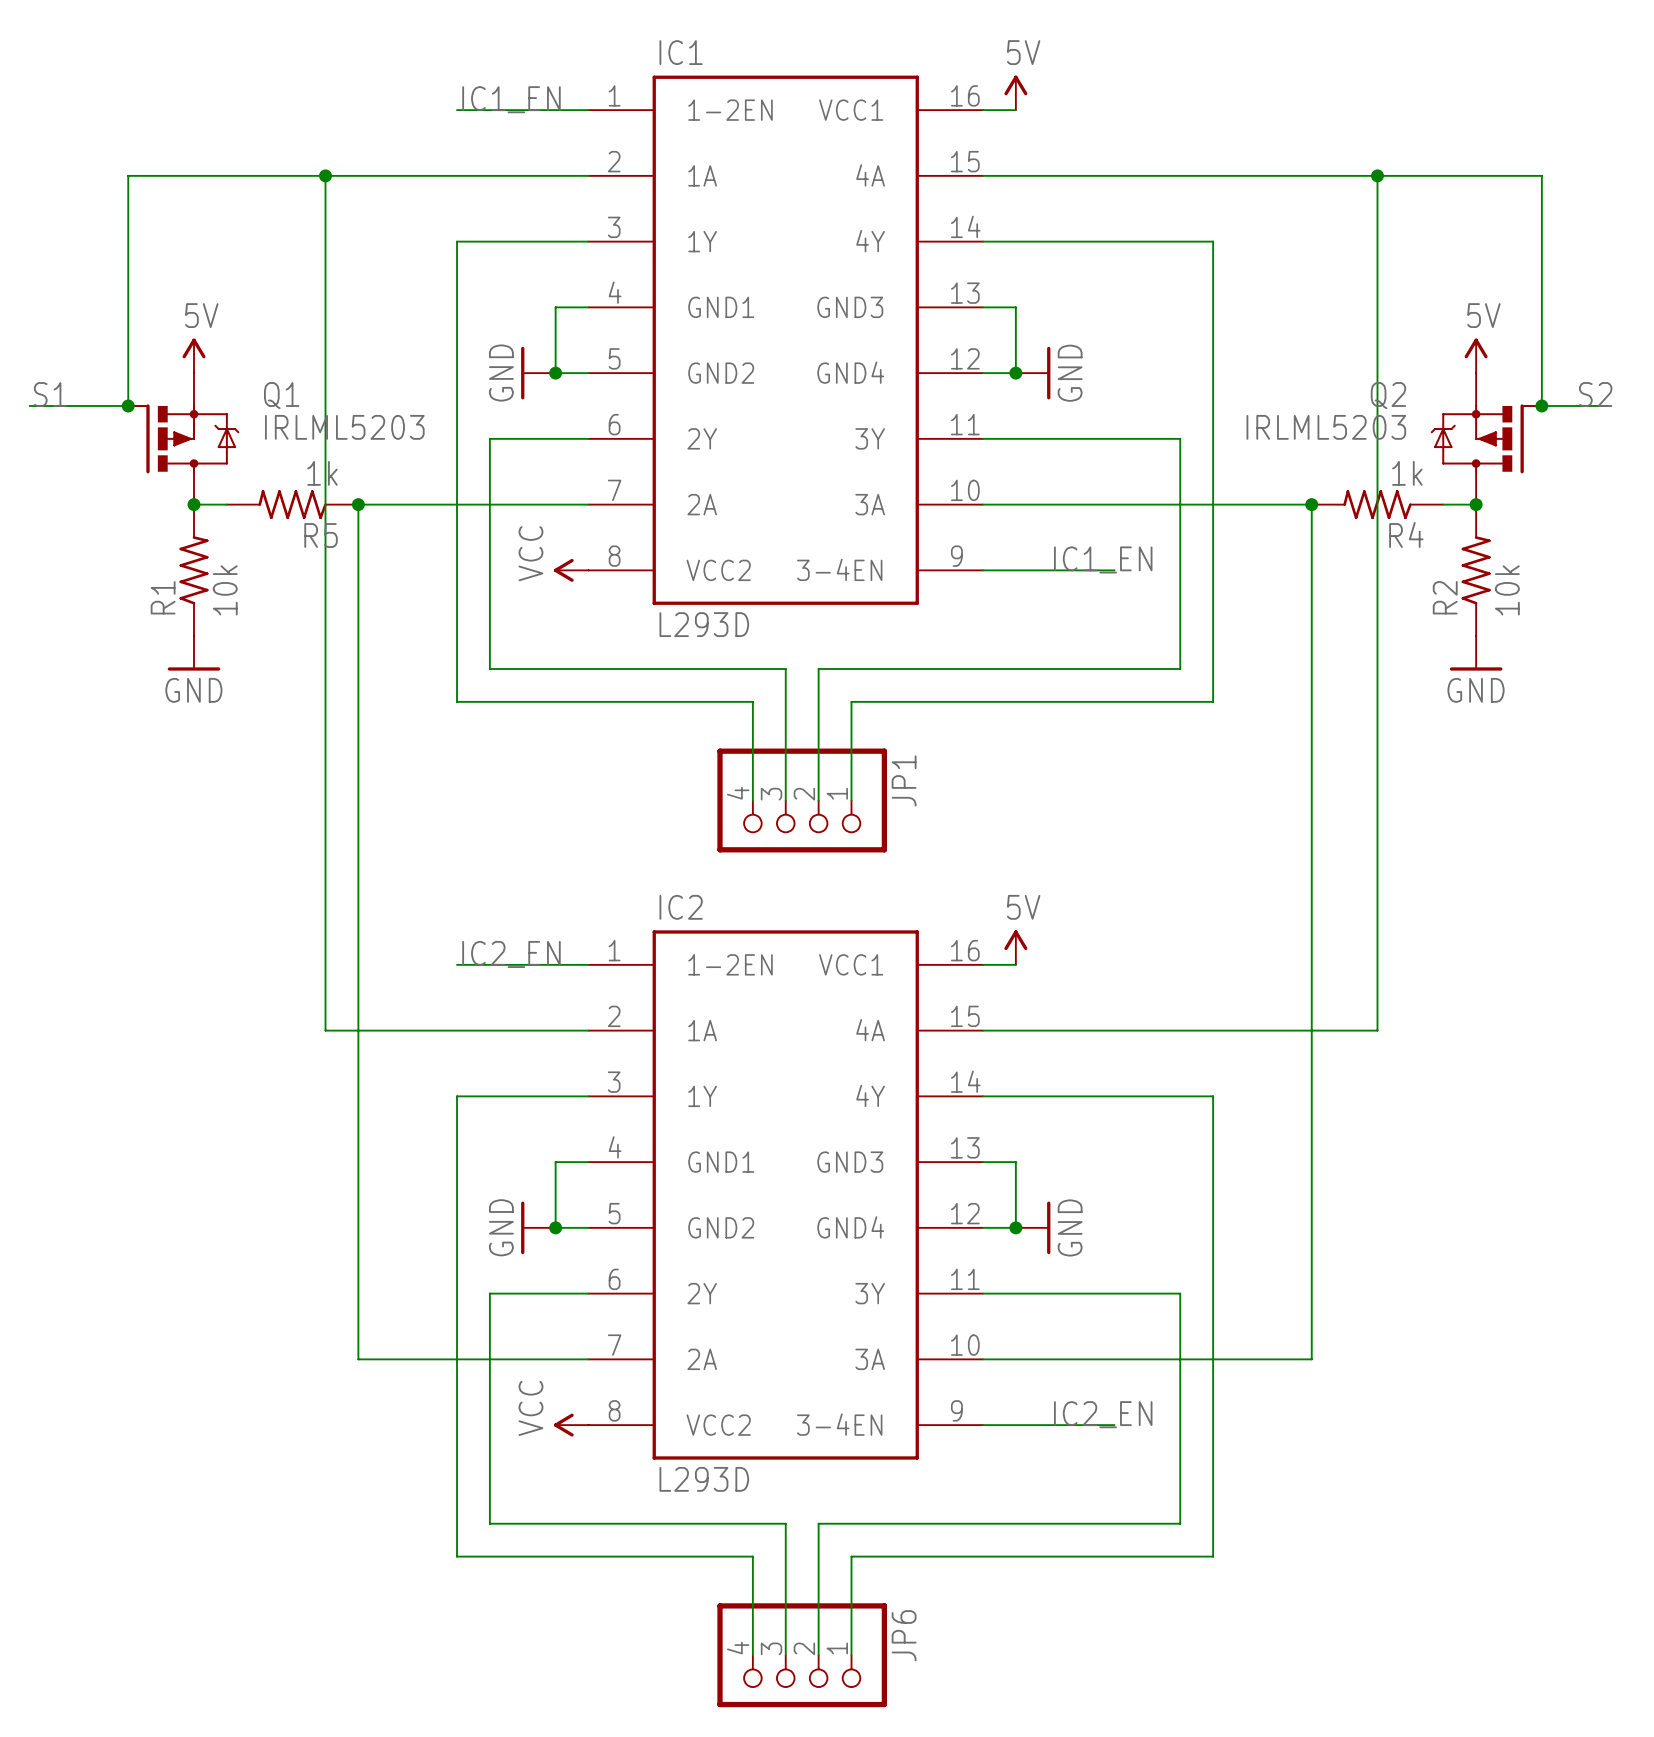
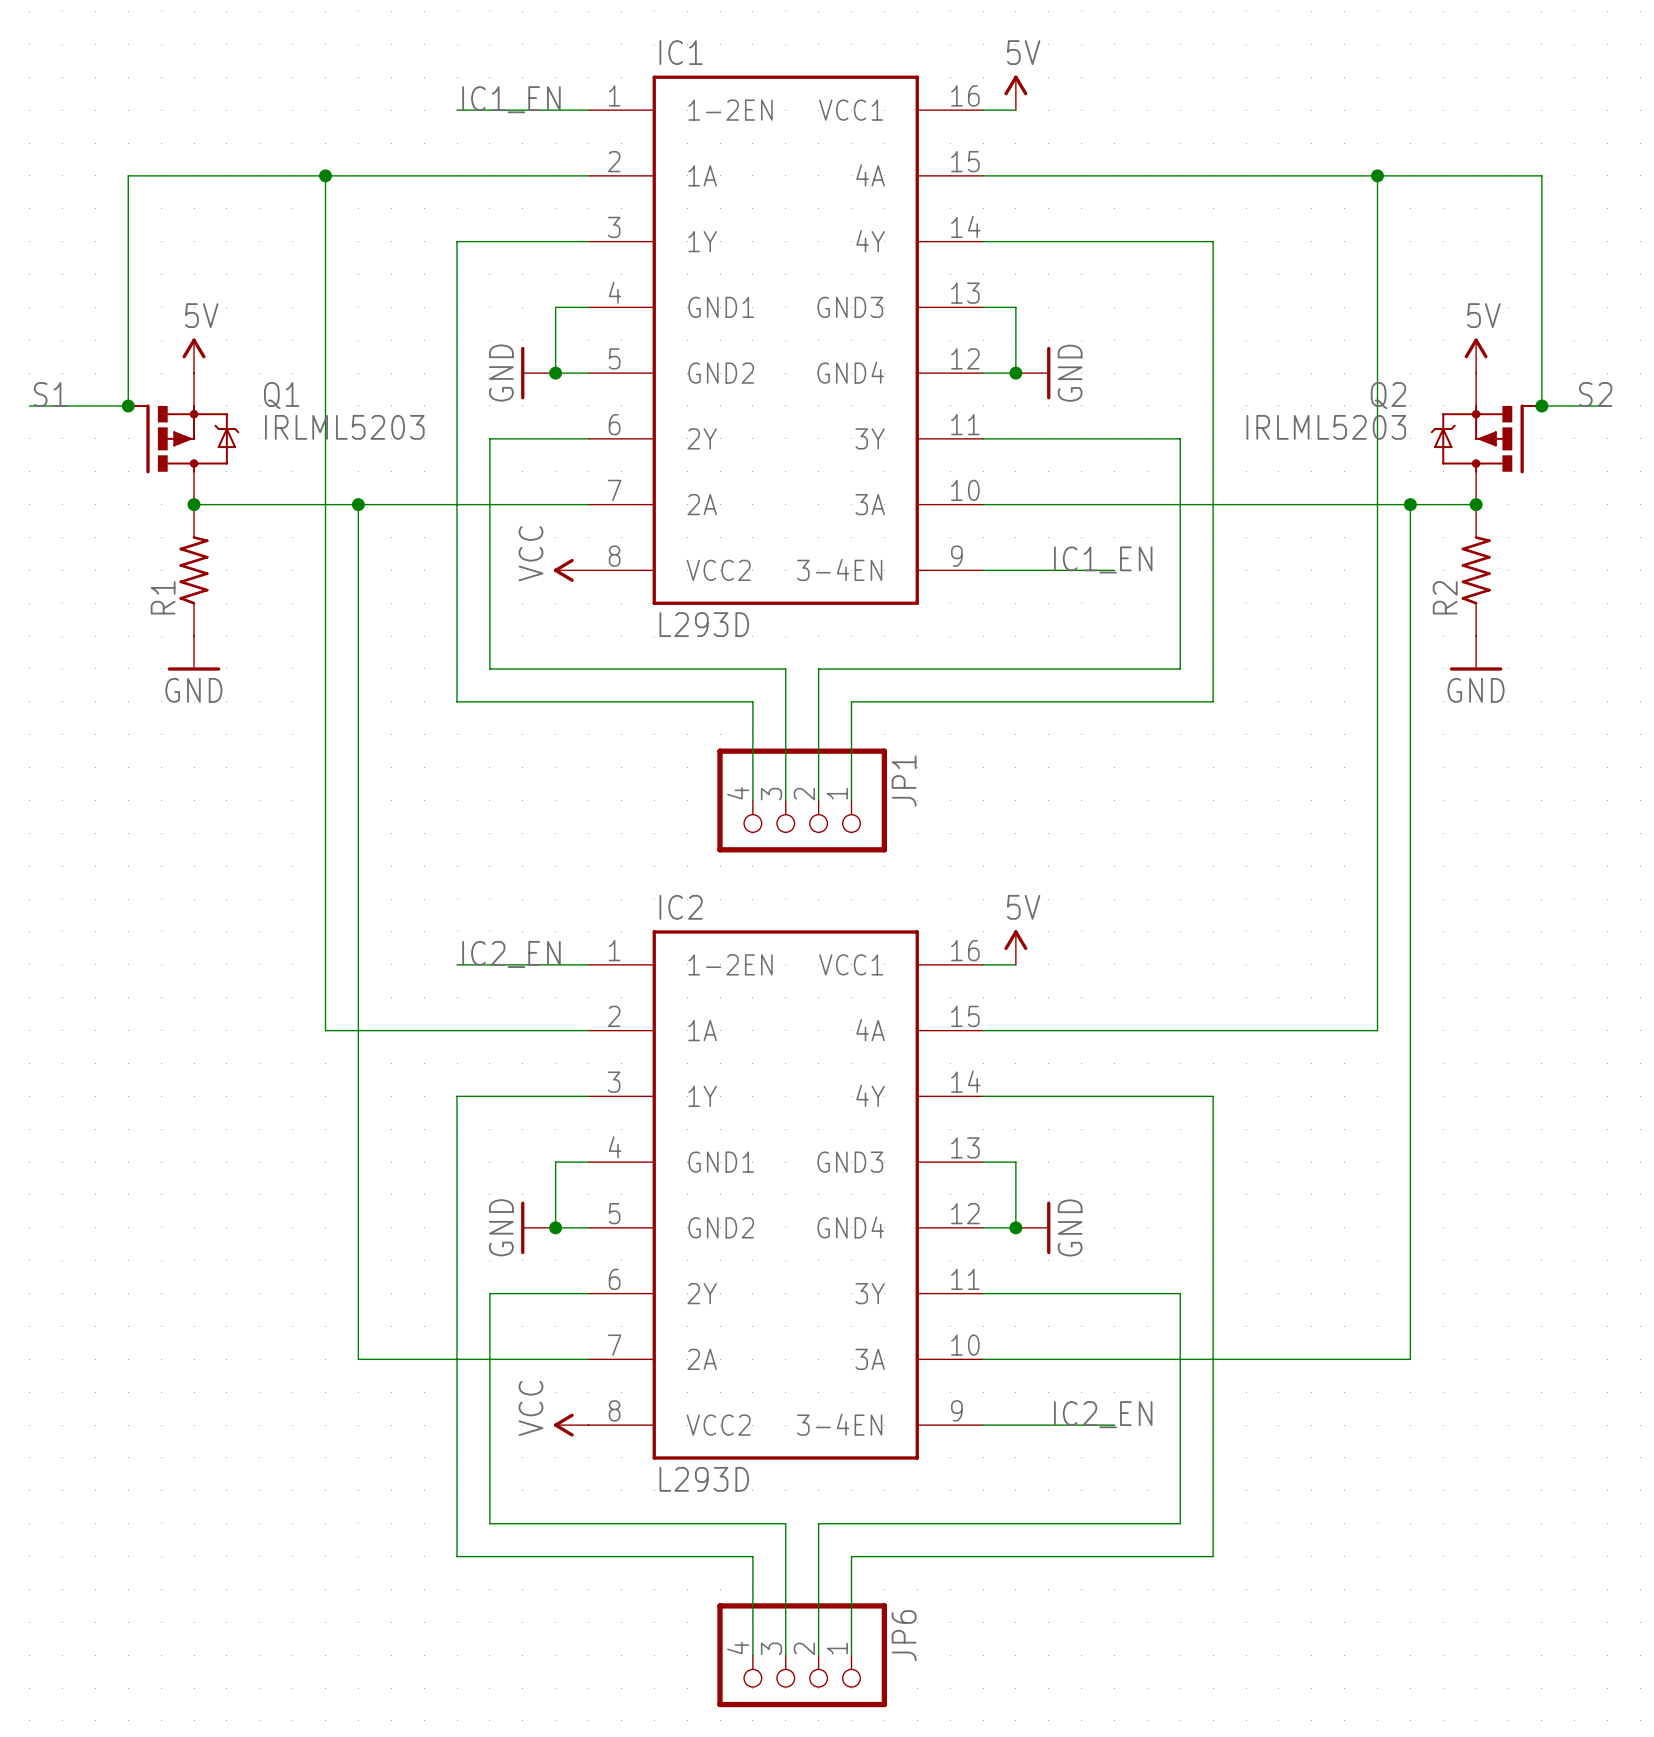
R5: 1k (292, 504) -> none
wire: (1311, 504) (1311, 1359) -> (1410, 504) (1410, 1359) (1311, 1359)
junction: (1311, 504) -> none
R4: 1k (1377, 504) -> none
junction: none -> (1410, 504)
R1 value: 10k (225, 590) -> none
R2 value: 10k (1507, 590) -> none

